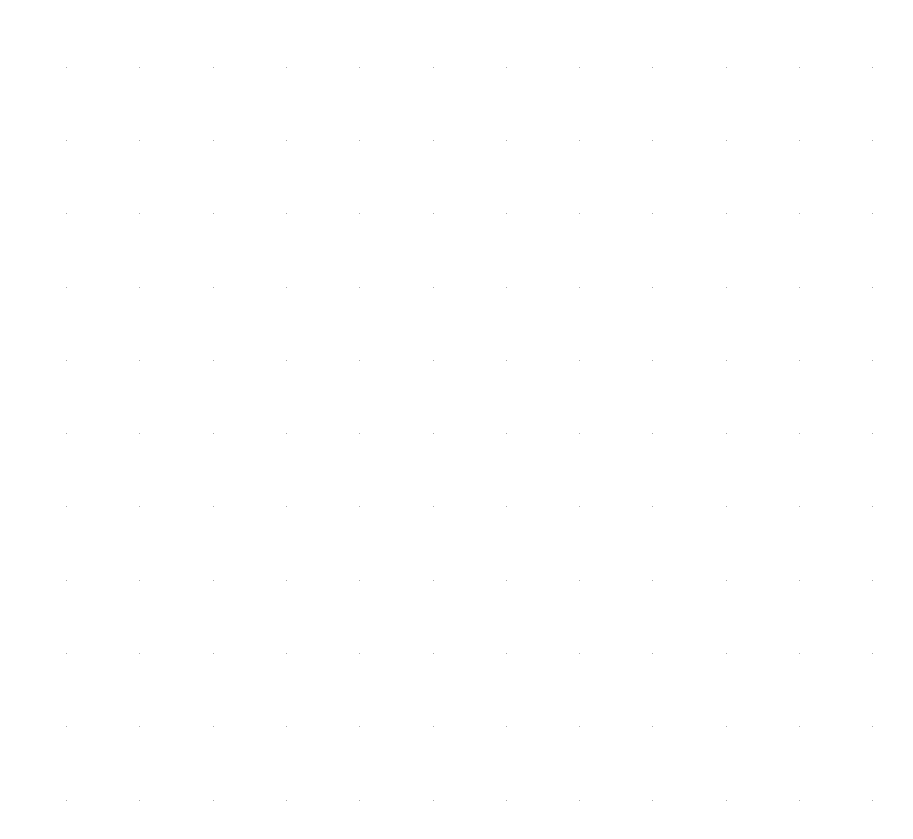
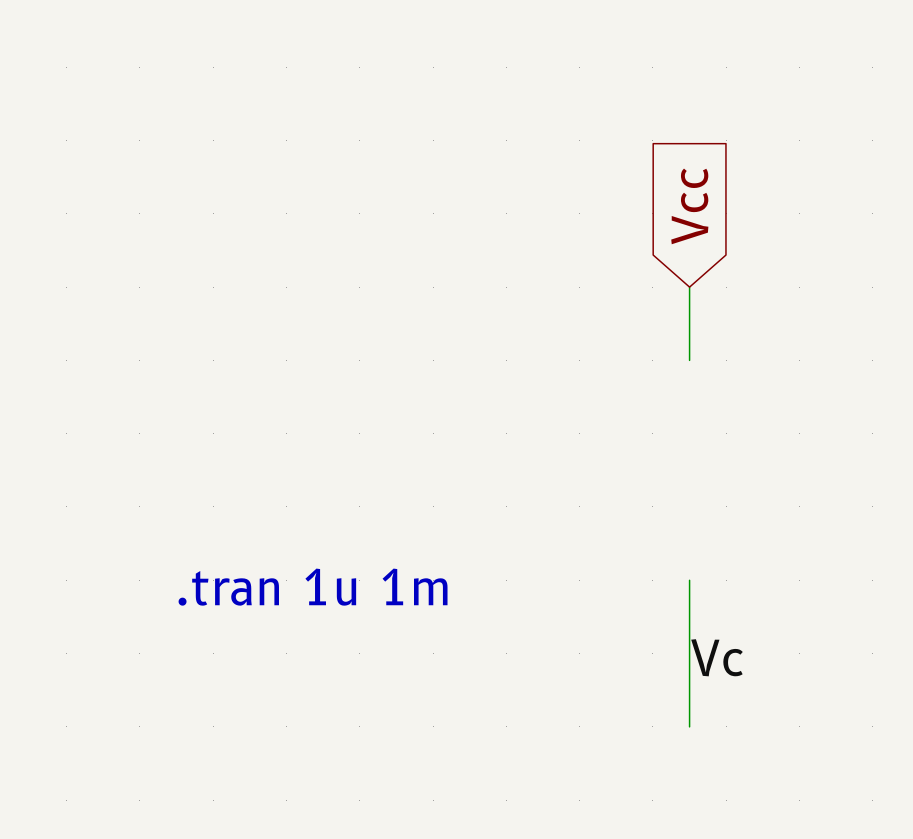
global label: none -> Vcc (689, 206)
wire: none -> (689, 287) (689, 360)
wire: none -> (689, 580) (689, 726)
text: none -> .tran 1u 1m (313, 587)
label: none -> Vc (716, 657)

